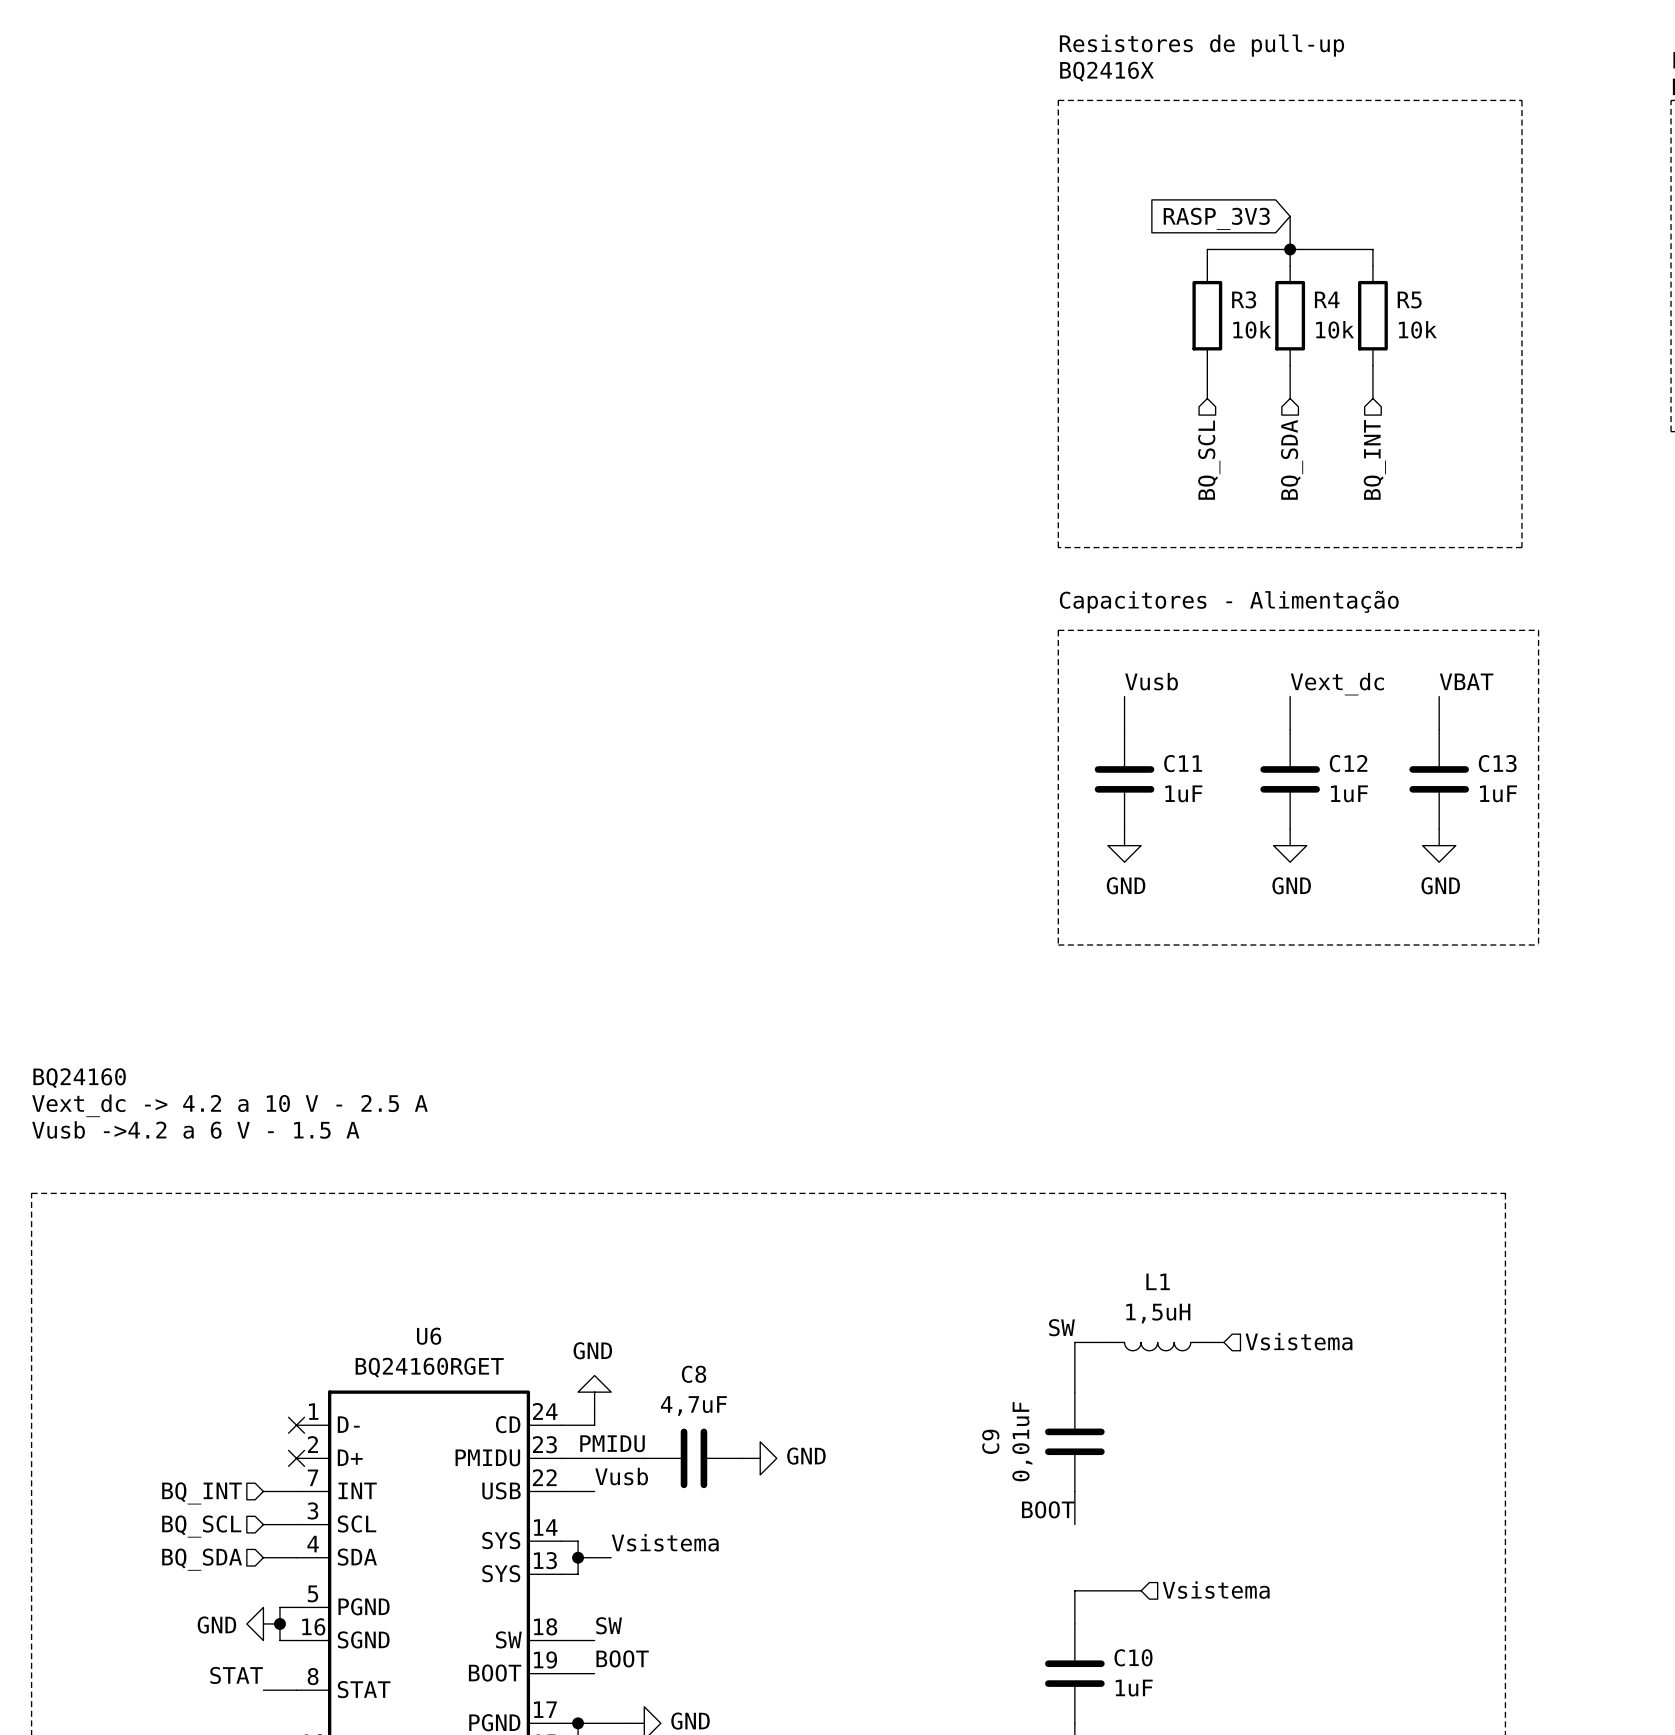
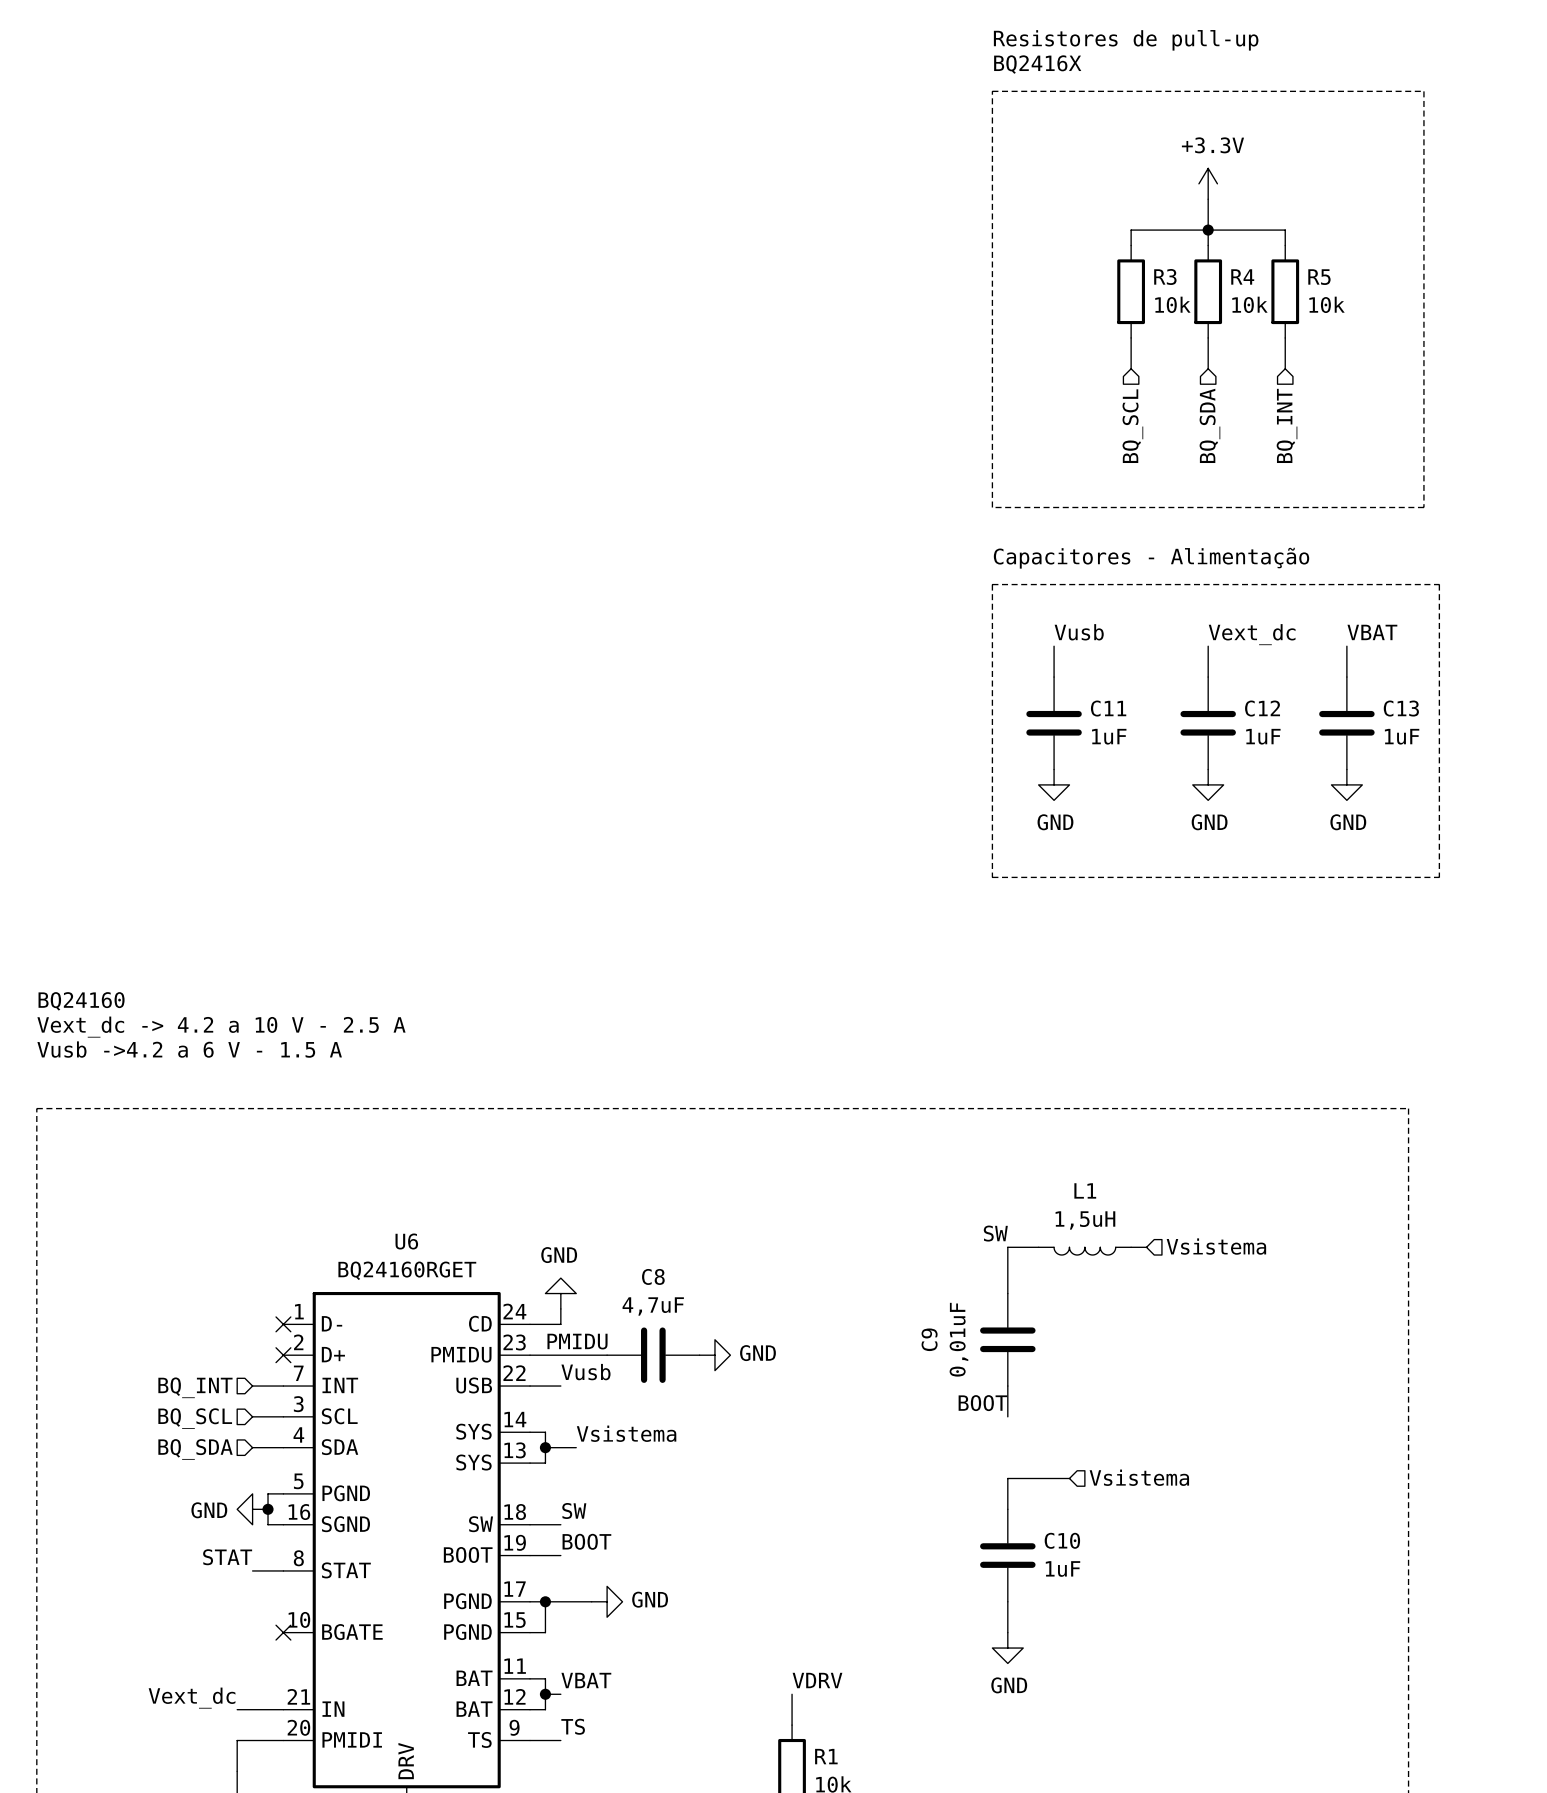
power symbol: none -> +3.3V (1208, 183)
global label: RASP_3V3 (1216, 218) -> none

